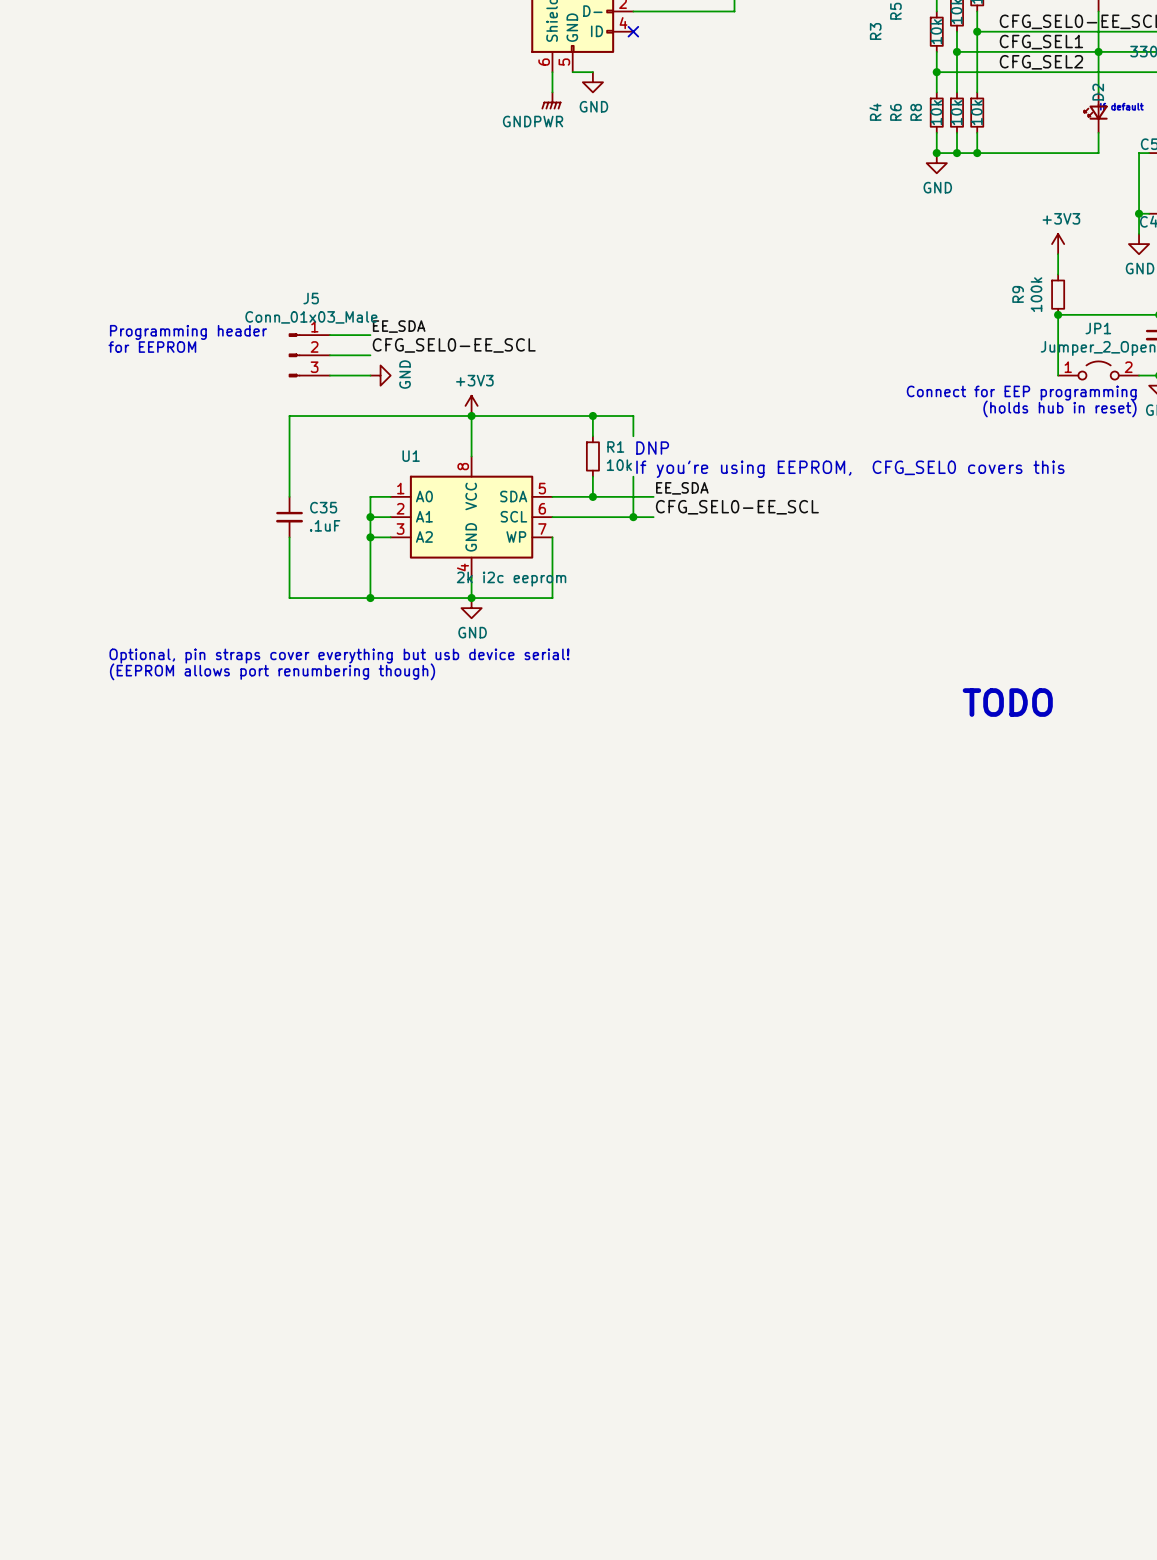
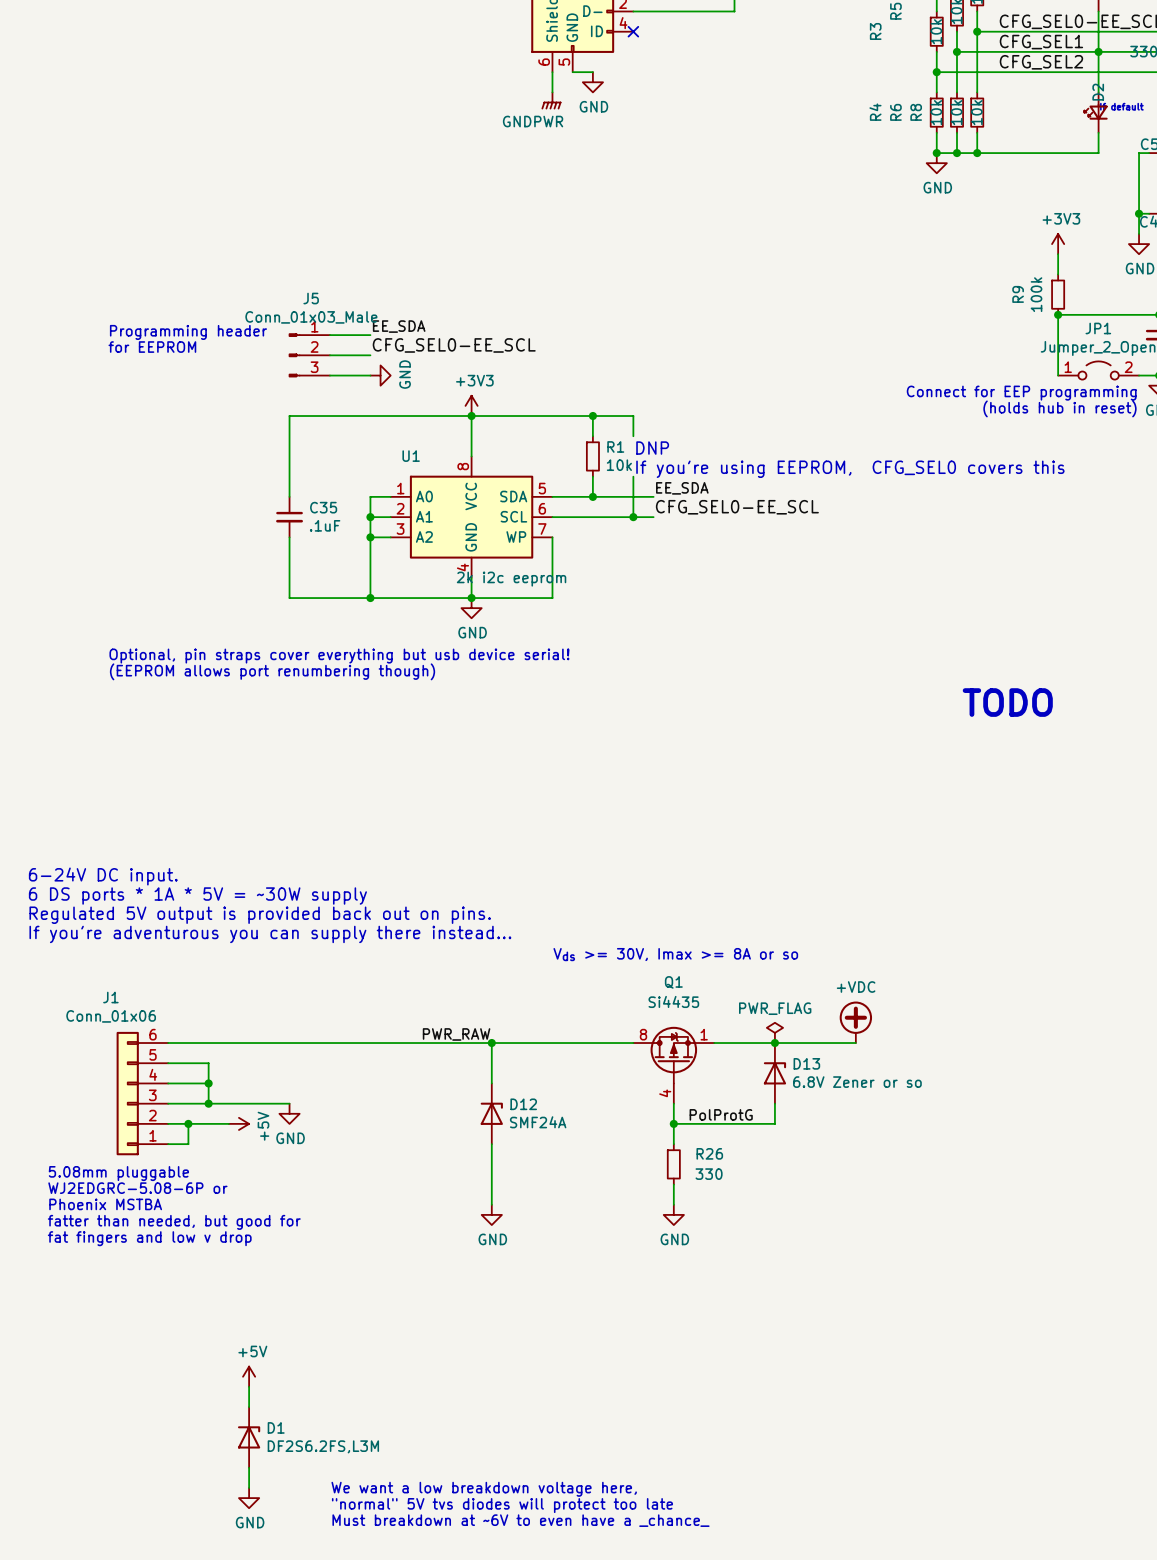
text: none -> 6-24V DC input. (103, 876)
text: none -> 6 DS ports * 1A * 5V = ~30W supply (197, 896)
text: none -> Regulated 5V output is provided back out on pins. (260, 915)
text: none -> If you're adventurous you can supply there instead... (270, 934)
text: none -> Vds >= 30V, Imax >= 8A or so (675, 954)
power symbol: none -> +VDC (855, 1022)
power symbol: none -> PWR_FLAG (774, 1032)
label: none -> PWR_RAW (456, 1034)
wire: none -> (168, 1043) (633, 1043)
wire: none -> (491, 1043) (491, 1083)
junction: none -> (491, 1043)
wire: none -> (714, 1043) (855, 1043)
junction: none -> (774, 1043)
wire: none -> (168, 1063) (208, 1063) (208, 1103)
Q1: none -> Si4435 (673, 1065)
D13: none -> 6.8V Zener or so (774, 1073)
wire: none -> (168, 1083) (208, 1083)
junction: none -> (208, 1083)
J1: none -> Conn_01x06 (142, 1093)
wire: none -> (168, 1103) (289, 1103)
junction: none -> (208, 1103)
wire: none -> (673, 1103) (673, 1144)
wire: none -> (774, 1103) (774, 1123) (673, 1123)
power symbol: none -> GND (289, 1113)
D12: none -> SMF24A (491, 1113)
label: none -> PolProtG (721, 1114)
wire: none -> (168, 1123) (228, 1123)
wire: none -> (188, 1123) (188, 1144) (168, 1144)
junction: none -> (188, 1123)
power symbol: none -> +5V (238, 1123)
junction: none -> (673, 1123)
wire: none -> (491, 1144) (491, 1204)
R26: none -> 330 (673, 1164)
text: none -> 5.08mm pluggable (118, 1173)
wire: none -> (673, 1184) (673, 1204)
text: none -> WJ2EDGRC-5.08-6P or (137, 1188)
text: none -> Phoenix MSTBA (105, 1204)
power symbol: none -> GND (491, 1214)
power symbol: none -> GND (673, 1214)
text: none -> fatter than needed, but good for (174, 1222)
text: none -> fat fingers and low v drop (149, 1238)
power symbol: none -> +5V (249, 1376)
wire: none -> (249, 1386) (249, 1407)
D1: none -> DF2S6.2FS,L3M (249, 1437)
wire: none -> (249, 1467) (249, 1487)
text: none -> We want a low breakdown voltage here, (484, 1489)
power symbol: none -> GND (249, 1498)
text: none -> "normal" 5V tvs diodes will protect too late (502, 1505)
text: none -> Must breakdown at ~6V to even have a _chance_ (521, 1520)

